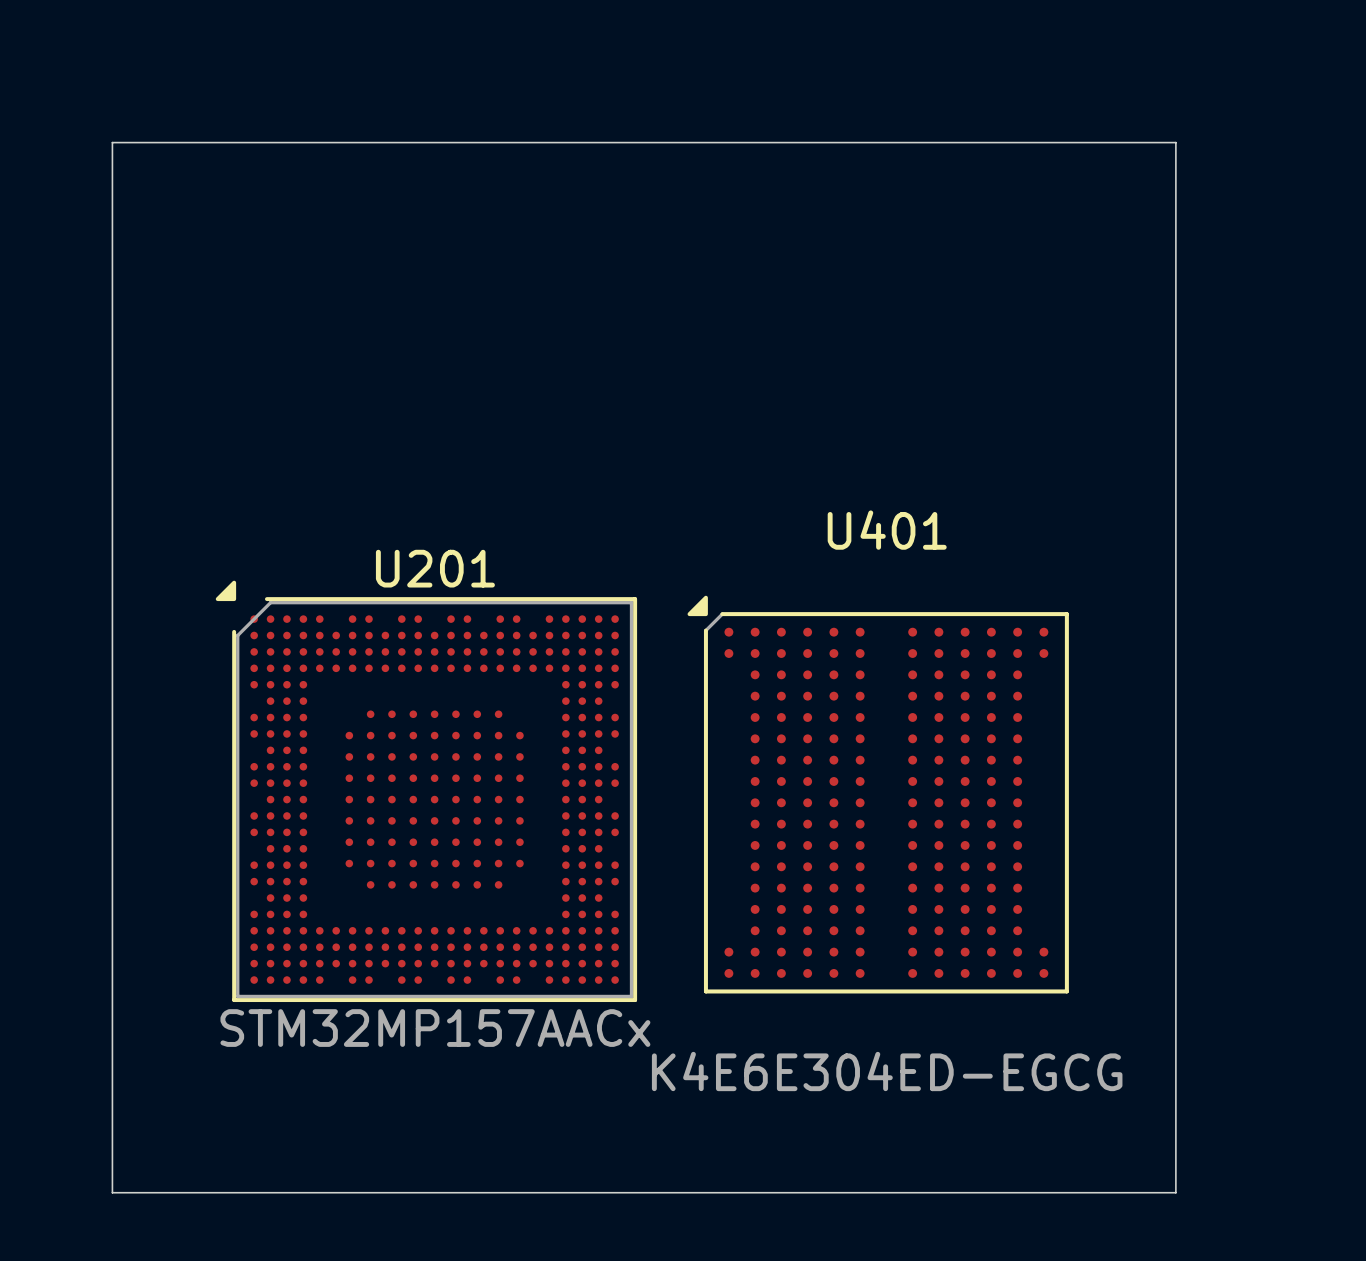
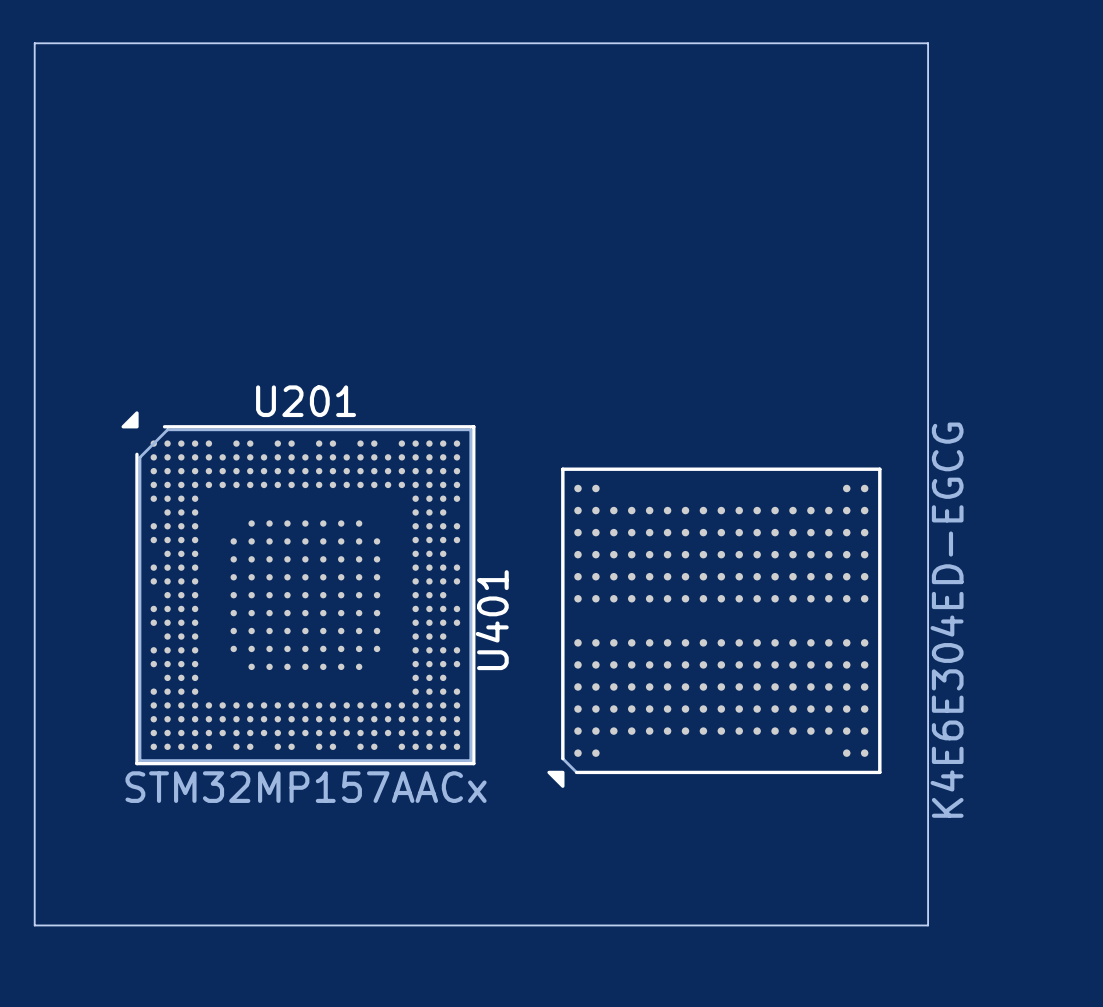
U401 rotation: 0° (878, 794) -> 90° counterclockwise (714, 627)

